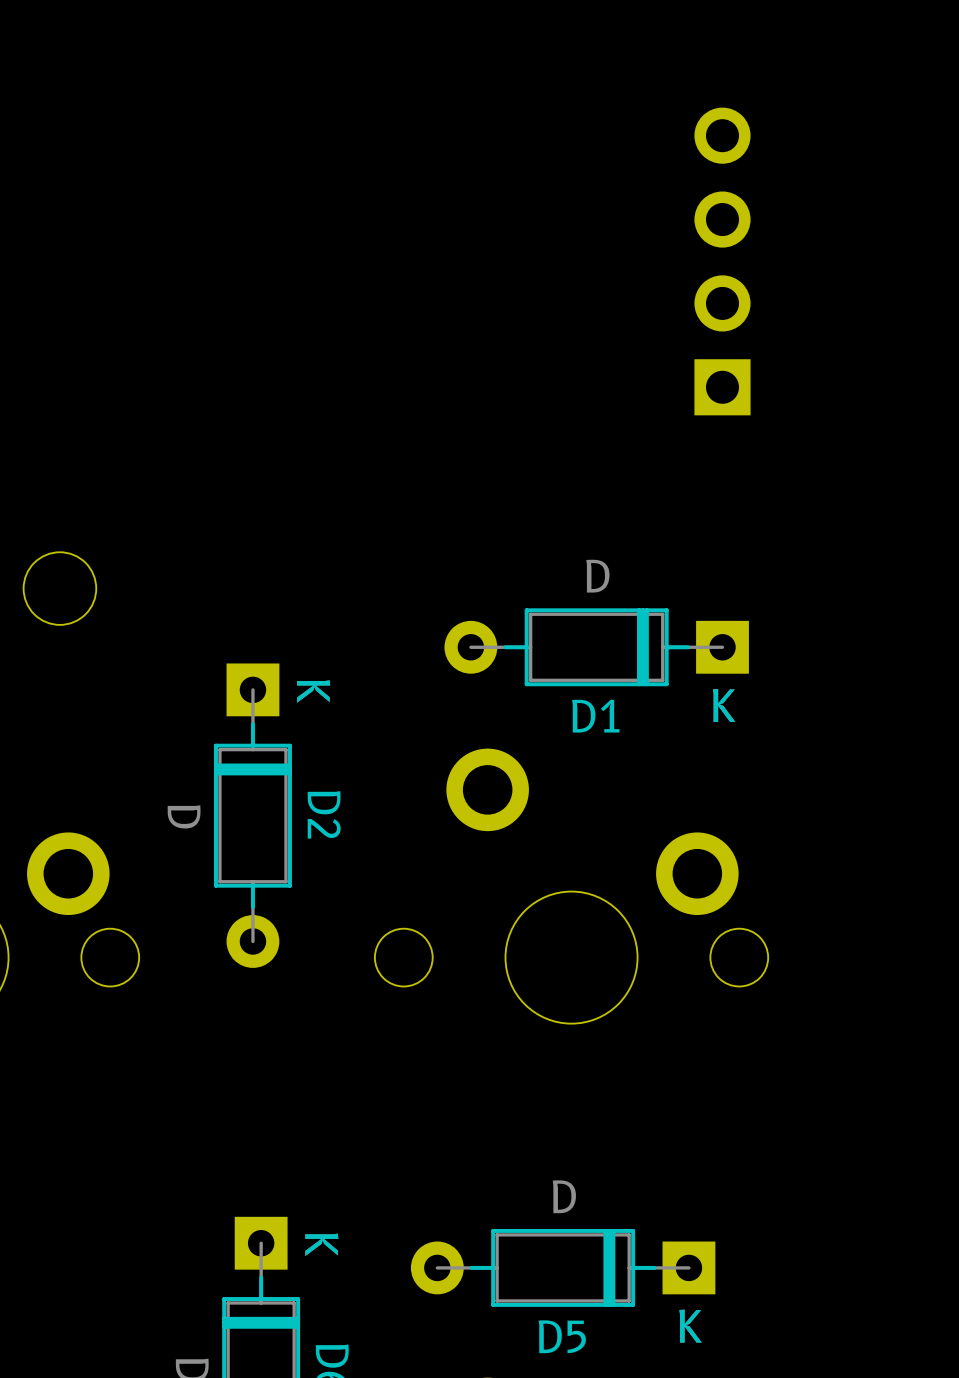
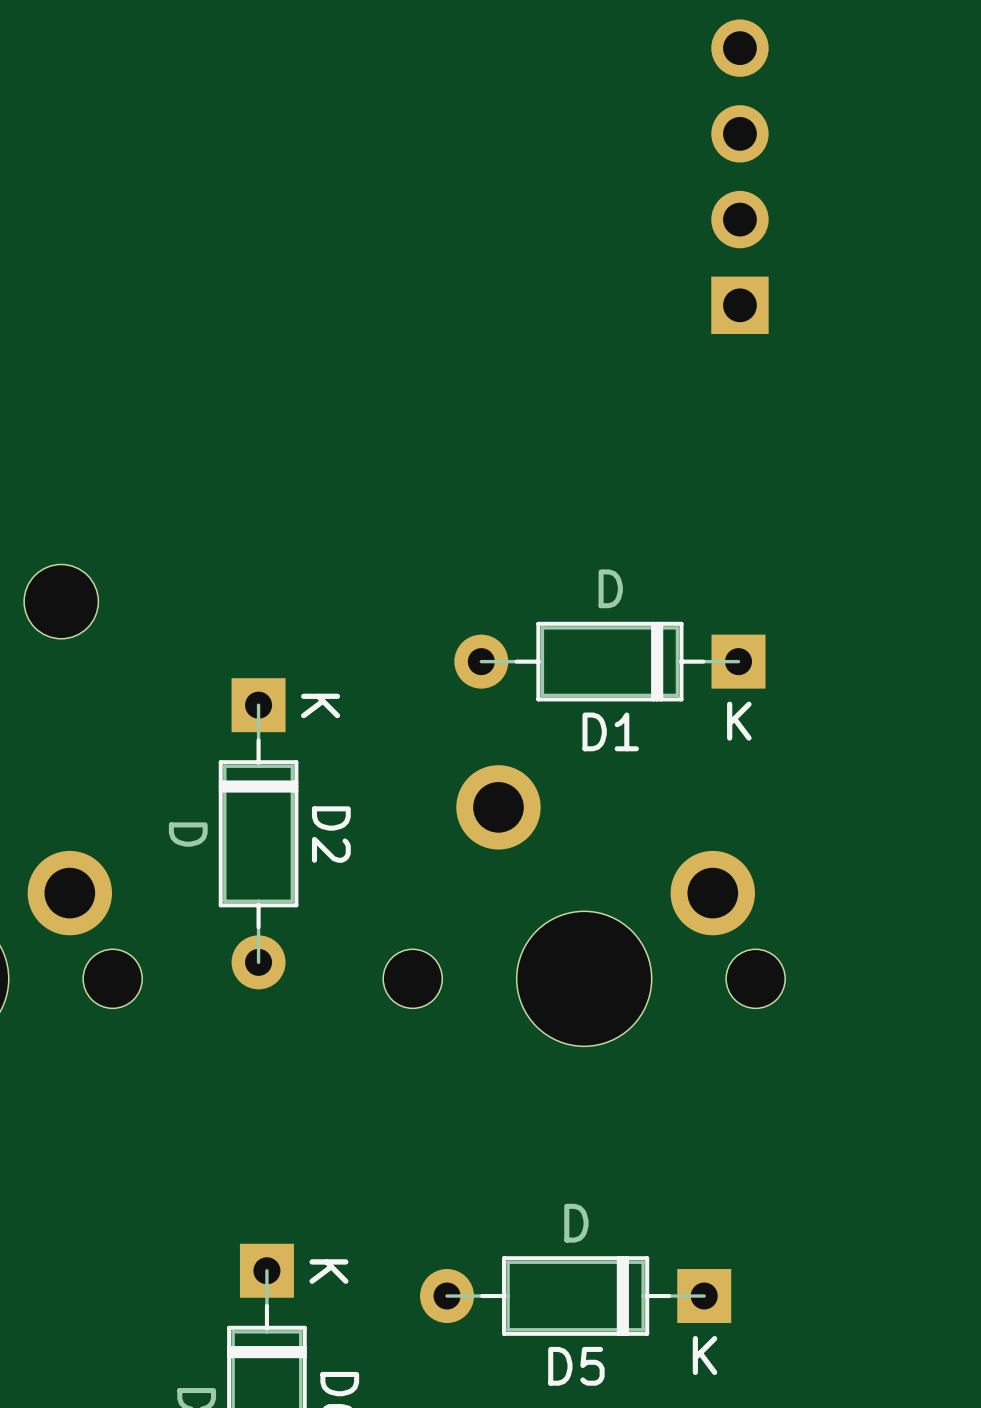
part position: (722, 261) -> (739, 176)

